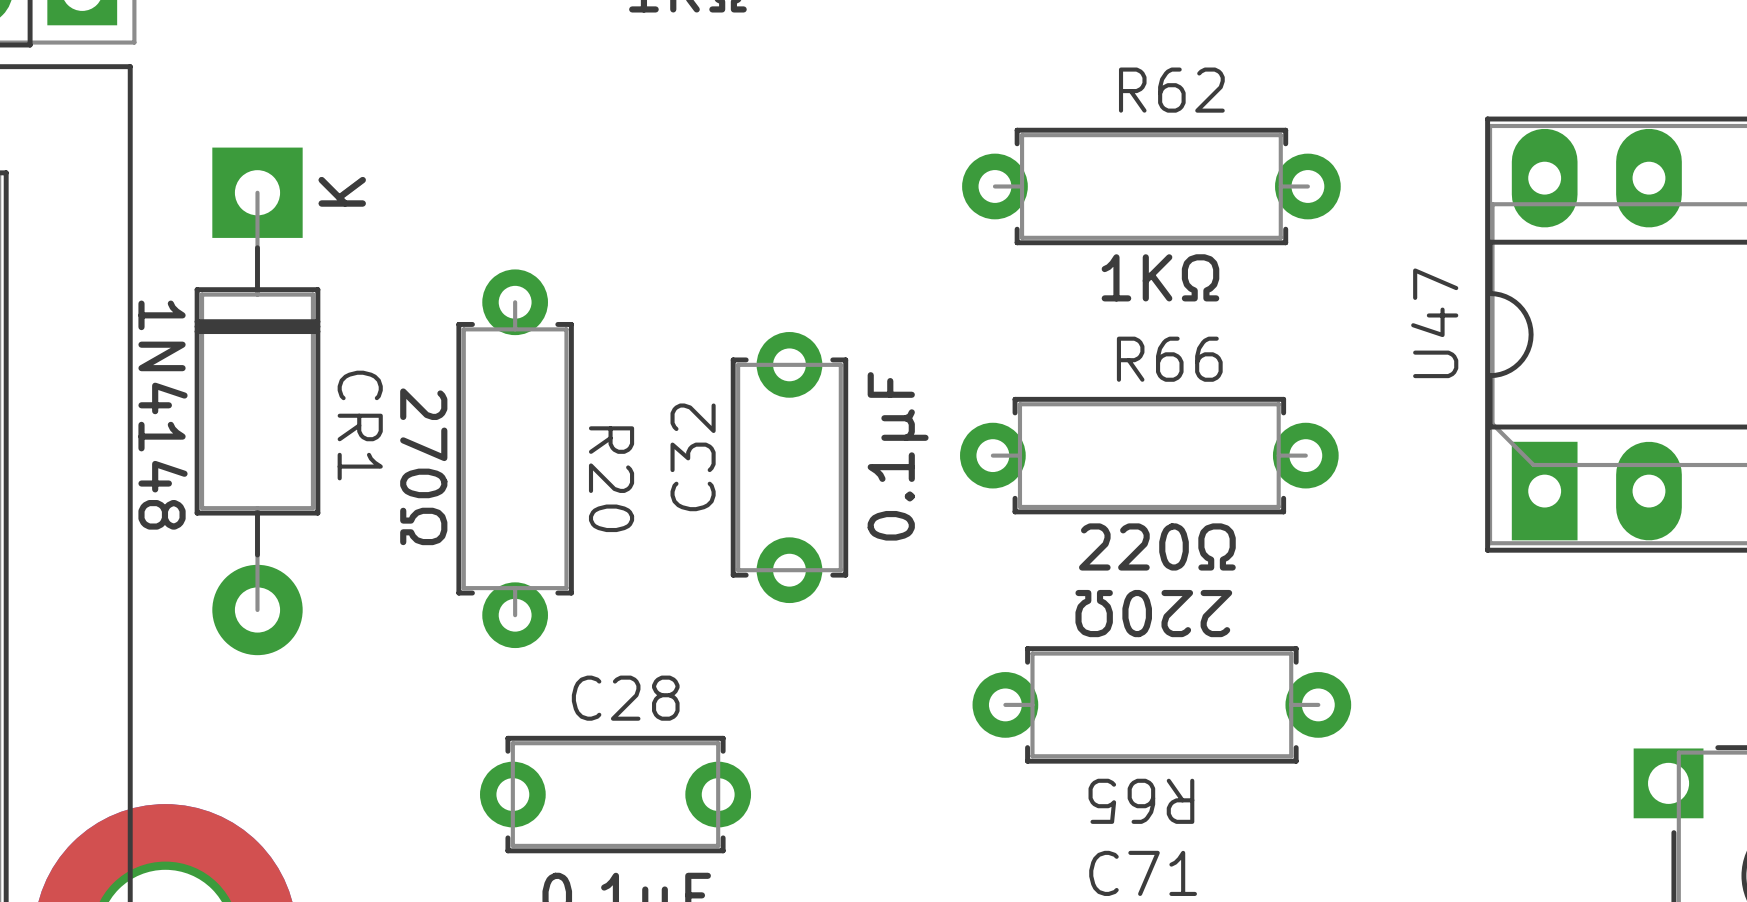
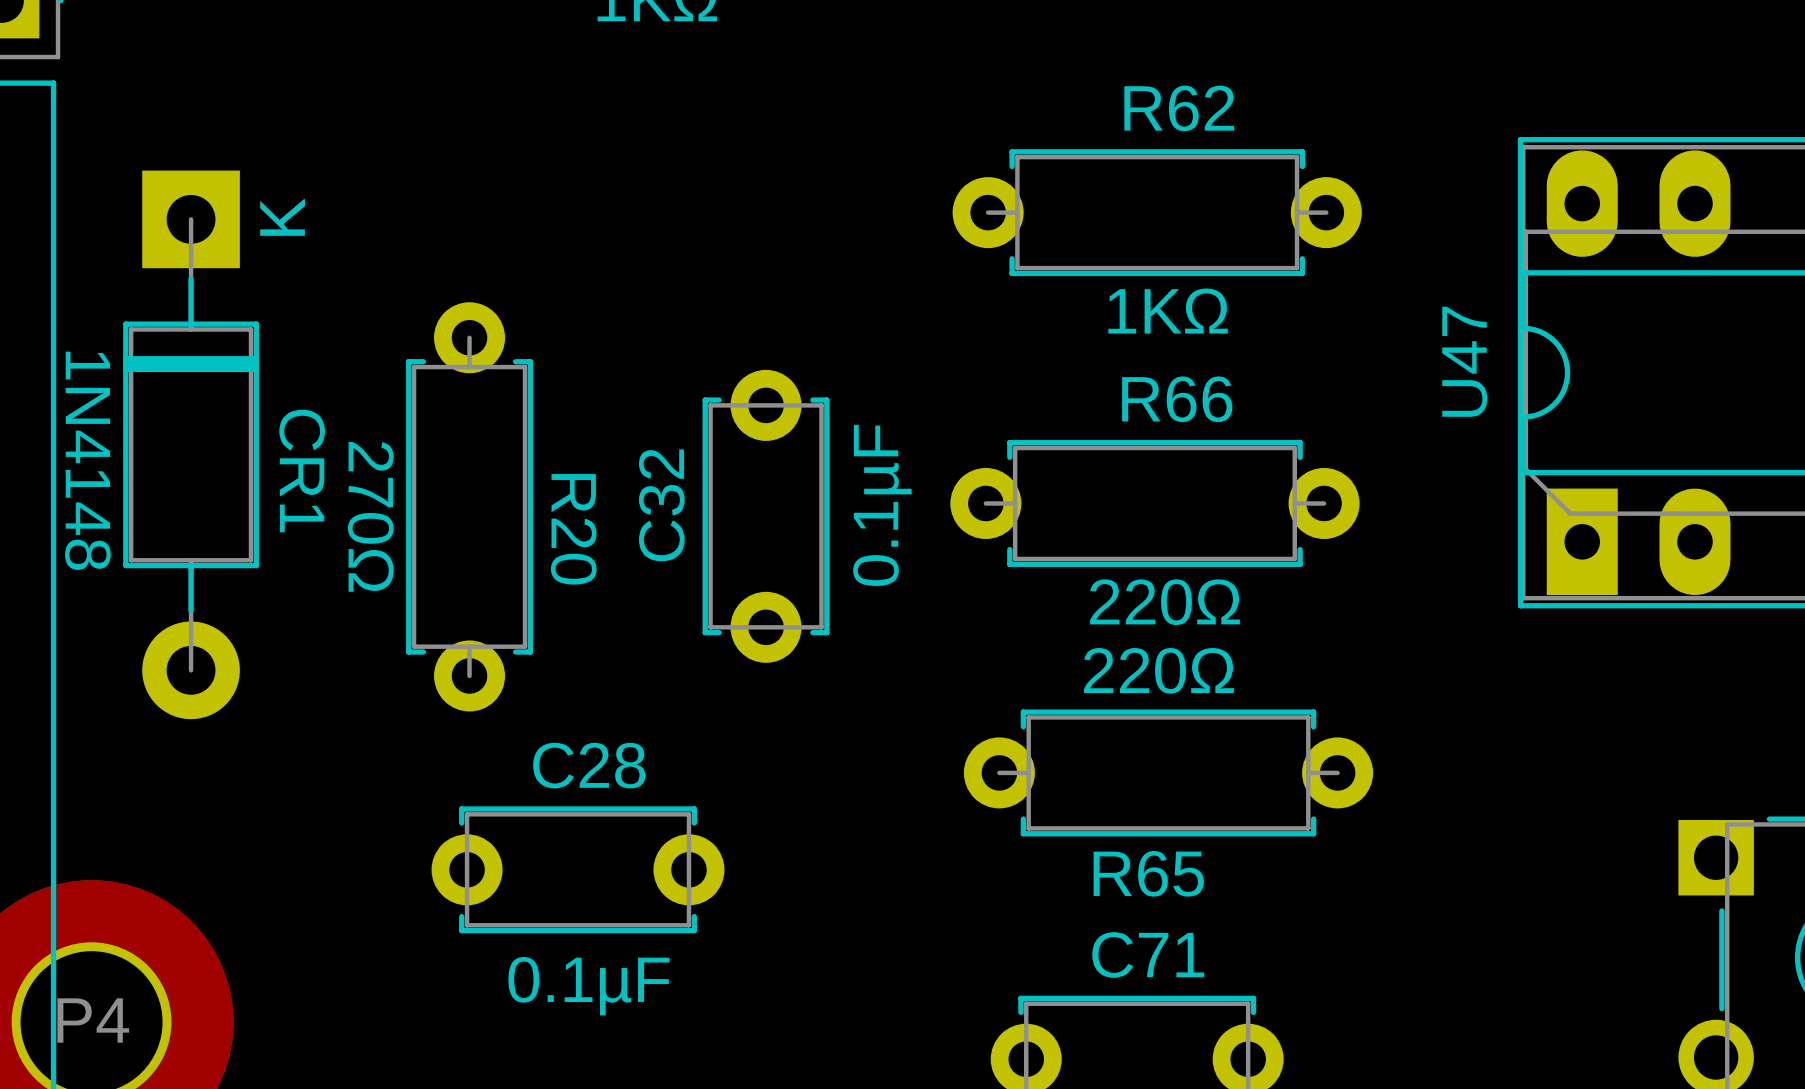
R65 value rotation: 0° (1153, 613) -> 180° (1158, 670)
R65 name rotation: 0° (1141, 801) -> 180° (1148, 873)

